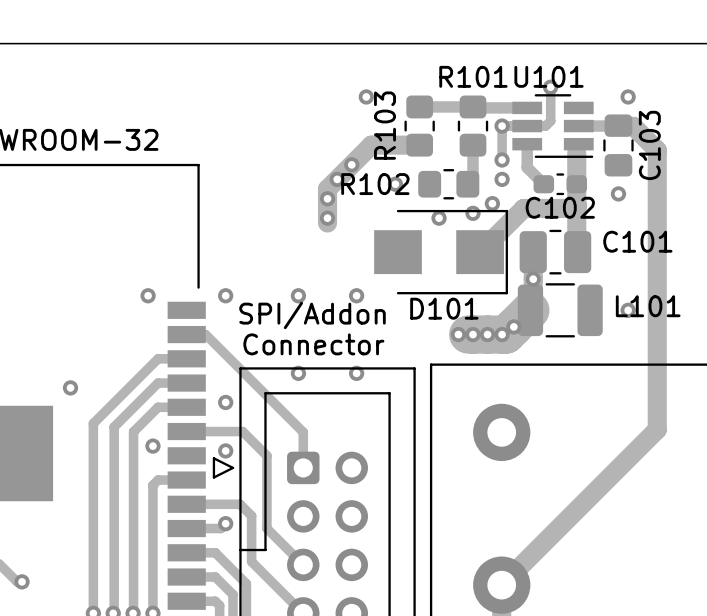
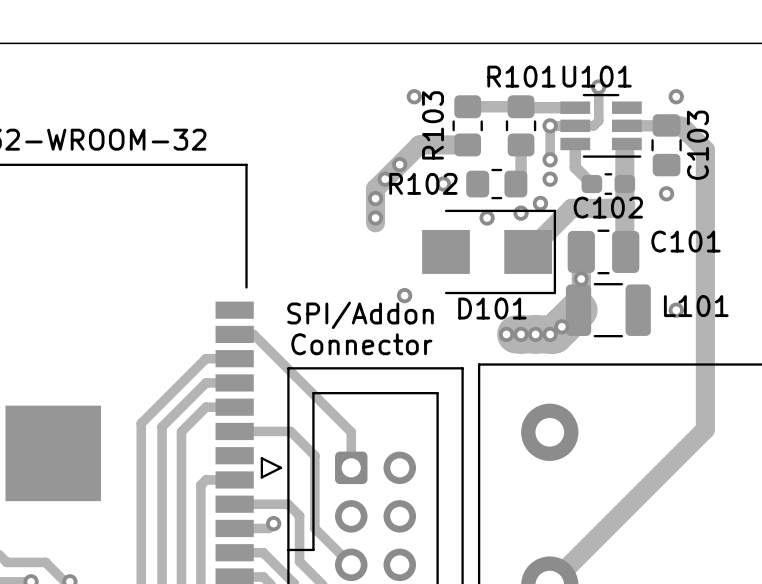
via: (148, 295) -> none
via: (225, 295) -> none
via: (298, 295) -> none
via: (298, 373) -> none
via: (356, 373) -> none
via: (70, 387) -> none
via: (225, 402) -> none
via: (152, 446) -> none
via: (225, 450) -> none

